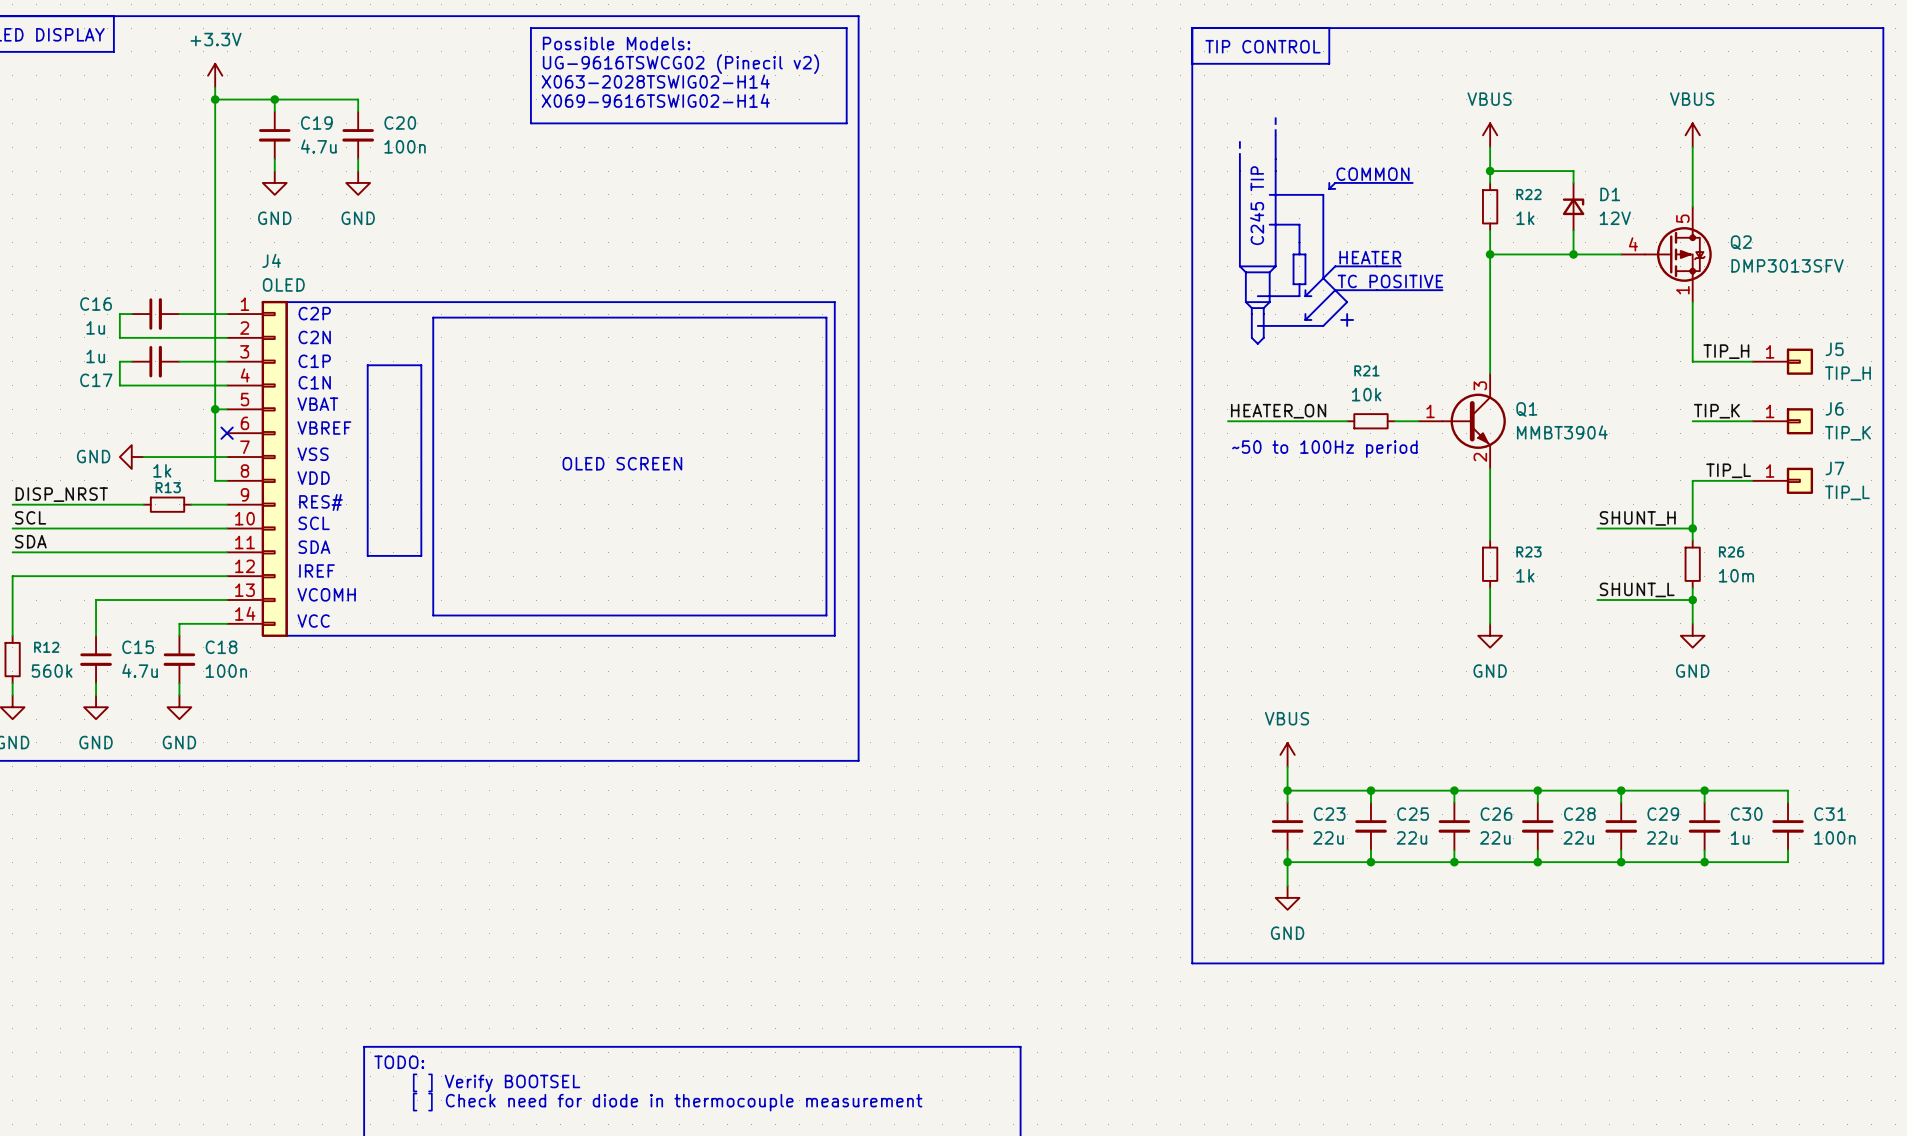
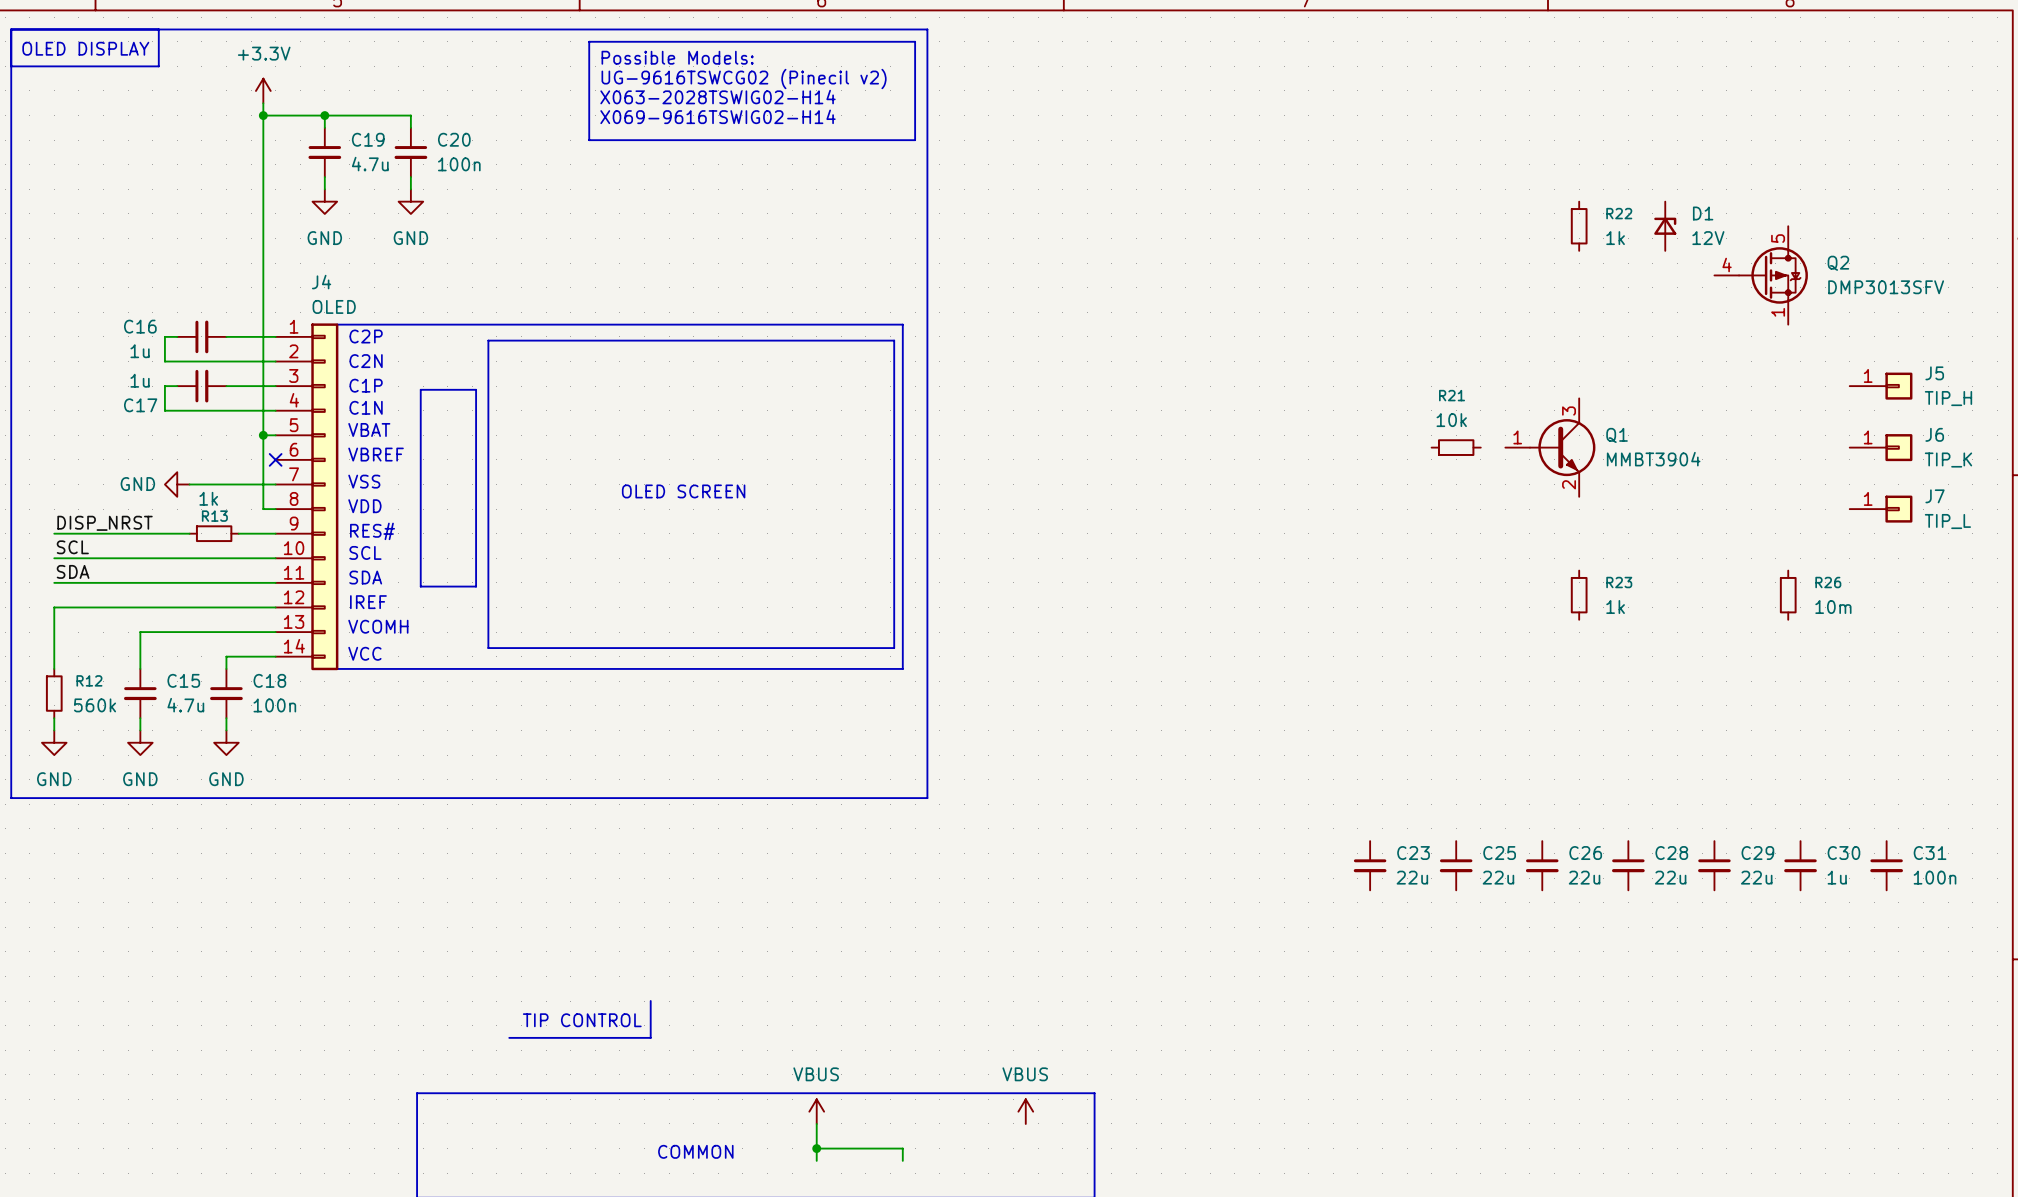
line: (1192, 28) (1883, 28) (1883, 963) (1192, 963) (1192, 28) -> none
line: (1329, 28) (1329, 63) (1192, 63) -> none
text: TIP CONTROL (1262, 46) -> none
line: (1275, 117) (1275, 266) -> none
power symbol: VBUS (1490, 135) -> none
power symbol: VBUS (1692, 135) -> none
line: (1239, 141) (1239, 266) -> none
wire: (1490, 147) (1490, 182) -> none
wire: (1692, 147) (1692, 206) -> none
wire: (1490, 171) (1573, 171) (1573, 182) -> none
junction: (1490, 171) -> none
text: COMMON (1373, 174) -> none
line: (1329, 182) (1329, 188) -> none
line: (1412, 182) (1335, 182) (1329, 188) -> none
line: (1329, 188) (1335, 188) -> none
line: (1269, 194) (1323, 194) (1323, 278) (1347, 302) (1323, 325) (1257, 325) -> none
text: C245 TIP (1257, 205) -> none
line: (1269, 224) (1299, 224) (1299, 254) -> none
wire: (1490, 230) (1490, 373) -> none
wire: (1573, 230) (1573, 254) -> none
line: (1293, 254) (1293, 284) (1305, 284) (1305, 254) (1293, 254) -> none
wire: (1490, 254) (1621, 254) -> none
junction: (1490, 254) -> none
junction: (1573, 254) -> none
text: HEATER (1370, 257) -> none
line: (1239, 266) (1275, 266) -> none
line: (1239, 266) (1245, 272) -> none
line: (1275, 266) (1269, 272) -> none
line: (1400, 266) (1335, 266) (1305, 296) -> none
line: (1245, 272) (1245, 302) -> none
line: (1245, 272) (1269, 272) -> none
line: (1269, 272) (1269, 302) -> none
text: TC POSITIVE (1390, 281) -> none
line: (1299, 284) (1299, 296) (1257, 296) -> none
line: (1305, 290) (1305, 296) -> none
line: (1442, 290) (1335, 290) (1305, 319) -> none
line: (1305, 296) (1311, 296) -> none
line: (1245, 302) (1269, 302) -> none
line: (1245, 302) (1251, 308) -> none
line: (1269, 302) (1263, 308) -> none
wire: (1692, 302) (1692, 361) (1752, 361) -> none
line: (1251, 308) (1263, 308) -> none
line: (1251, 308) (1251, 337) (1257, 343) (1263, 337) (1263, 308) -> none
line: (1305, 314) (1305, 319) -> none
line: (1347, 314) (1347, 325) -> none
line: (1305, 319) (1311, 319) -> none
line: (1341, 319) (1353, 319) -> none
label: TIP_H (1726, 351) -> none
label: HEATER_ON (1278, 411) -> none
label: TIP_K (1716, 411) -> none
wire: (1227, 421) (1347, 421) -> none
wire: (1394, 421) (1418, 421) -> none
wire: (1692, 421) (1752, 421) -> none
text: ~50 to 100Hz period (1324, 449) -> none
wire: (1490, 468) (1490, 540) -> none
label: TIP_L (1728, 470) -> none
wire: (1752, 480) (1692, 480) (1692, 540) -> none
label: SHUNT_H (1637, 518) -> none
wire: (1597, 528) (1692, 528) -> none
junction: (1692, 528) -> none
wire: (1490, 588) (1490, 623) -> none
wire: (1692, 588) (1692, 623) -> none
label: SHUNT_L (1637, 589) -> none
wire: (1597, 600) (1692, 600) -> none
junction: (1692, 600) -> none
power symbol: GND (1490, 635) -> none
power symbol: GND (1692, 635) -> none
power symbol: VBUS (1287, 754) -> none
wire: (1287, 766) (1287, 802) -> none
wire: (1287, 790) (1788, 790) (1788, 802) -> none
junction: (1287, 790) -> none
wire: (1370, 790) (1370, 802) -> none
junction: (1370, 790) -> none
wire: (1454, 790) (1454, 802) -> none
junction: (1454, 790) -> none
wire: (1537, 790) (1537, 802) -> none
junction: (1537, 790) -> none
wire: (1621, 790) (1621, 802) -> none
junction: (1621, 790) -> none
wire: (1704, 790) (1704, 802) -> none
junction: (1704, 790) -> none
wire: (1287, 850) (1287, 885) -> none
wire: (1370, 850) (1370, 862) -> none
wire: (1454, 850) (1454, 862) -> none
wire: (1537, 850) (1537, 862) -> none
wire: (1621, 850) (1621, 862) -> none
wire: (1704, 850) (1704, 862) -> none
wire: (1788, 850) (1788, 862) (1287, 862) -> none
junction: (1287, 862) -> none
junction: (1370, 862) -> none
junction: (1454, 862) -> none
junction: (1537, 862) -> none
junction: (1621, 862) -> none
junction: (1704, 862) -> none
power symbol: GND (1287, 897) -> none
line: none -> (650, 1001) (650, 1037) (509, 1037)
text: none -> TIP CONTROL (582, 1020)
text: TODO: (399, 1062) -> none
power symbol: none -> VBUS (816, 1111)
power symbol: none -> VBUS (1025, 1111)
wire: none -> (816, 1123) (816, 1160)
text: [ ] Verify BOOTSEL (496, 1082) -> none
wire: none -> (816, 1148) (902, 1148) (902, 1160)
junction: none -> (816, 1148)
text: [ ] Check need for diode in thermocouple measurement (667, 1102) -> none
text: none -> COMMON (695, 1151)

